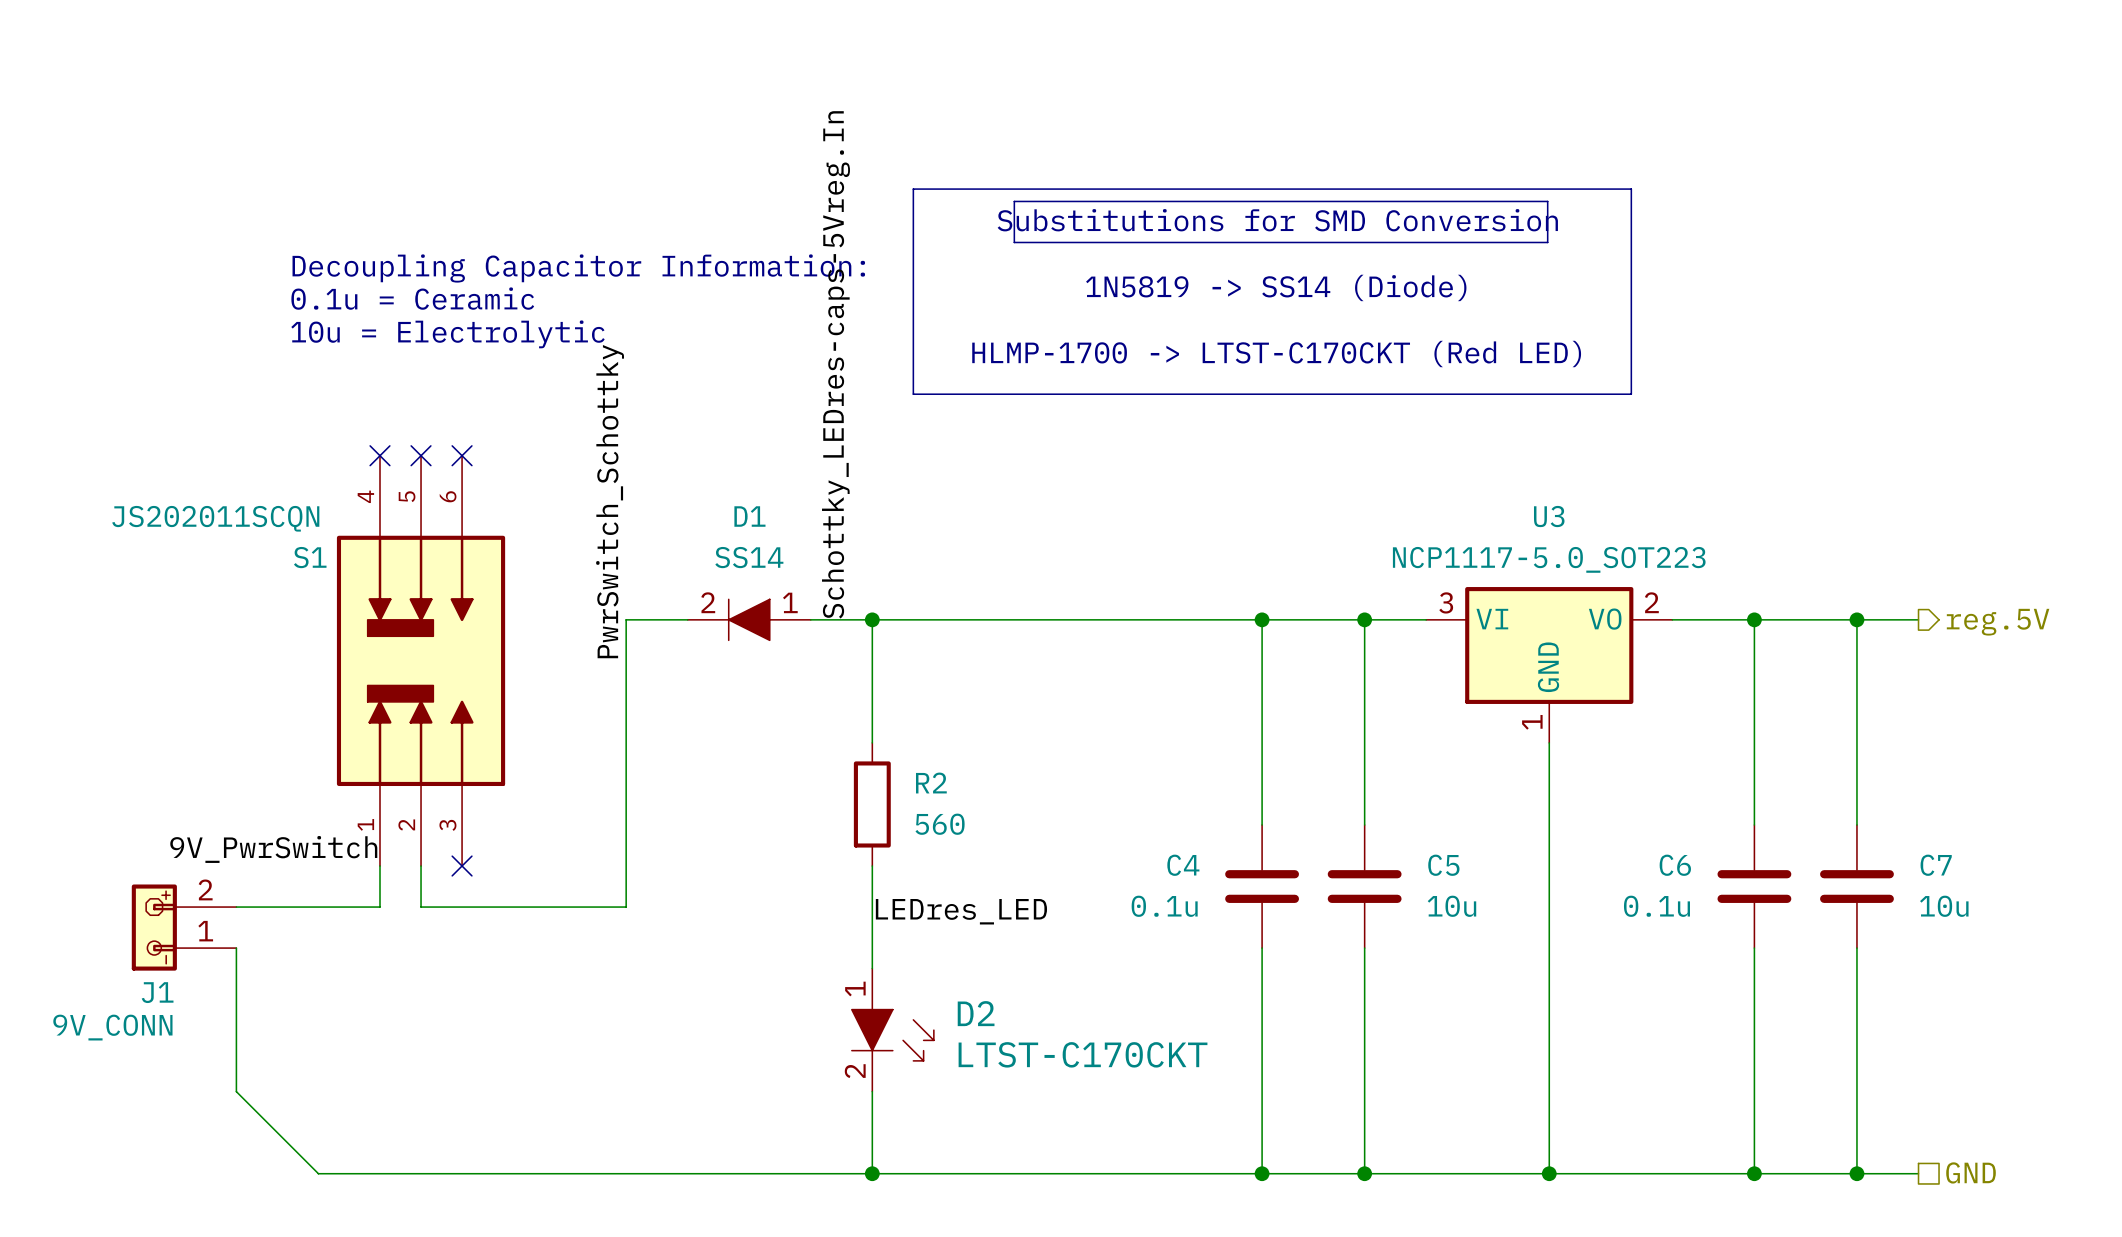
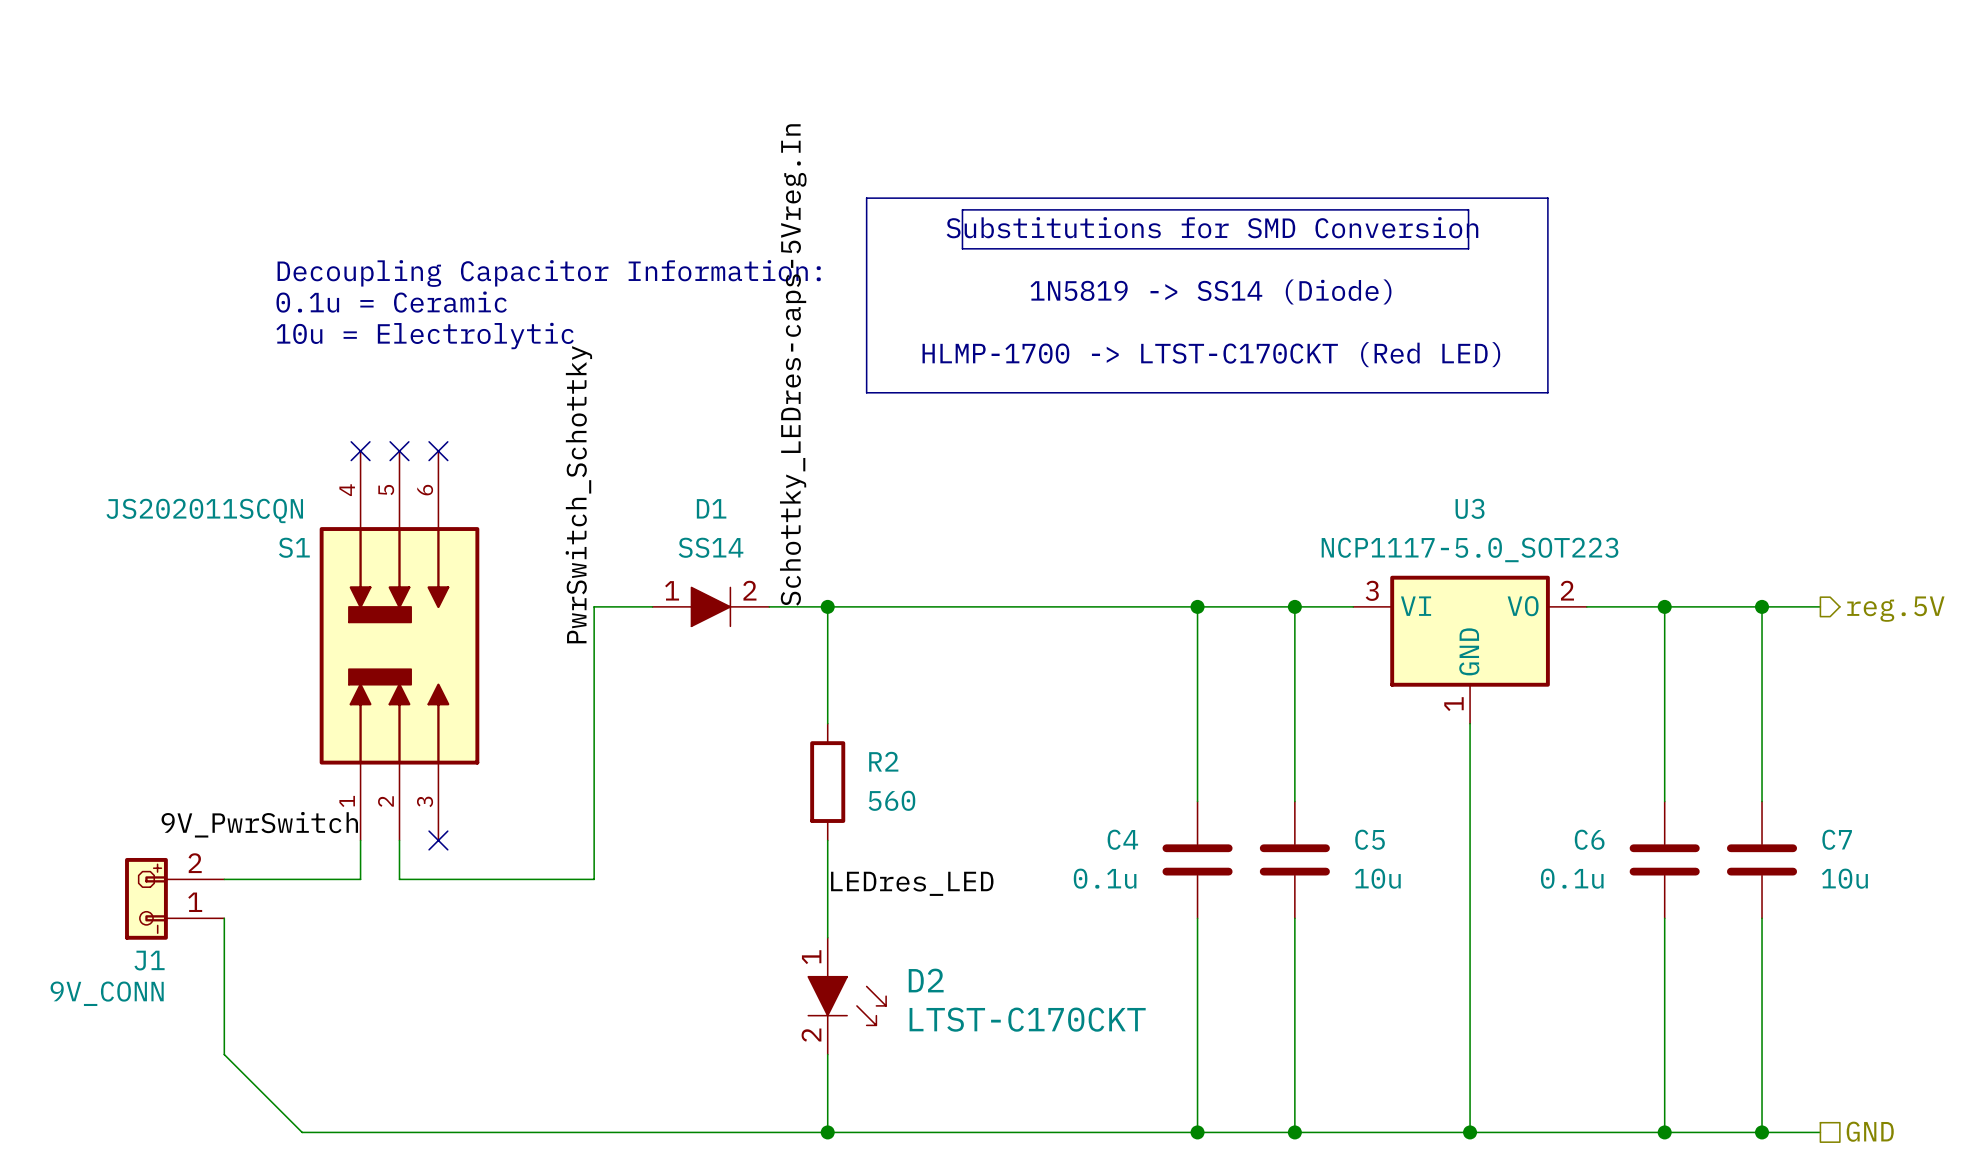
D1 rotation: 0° (749, 619) -> 180° (710, 606)

